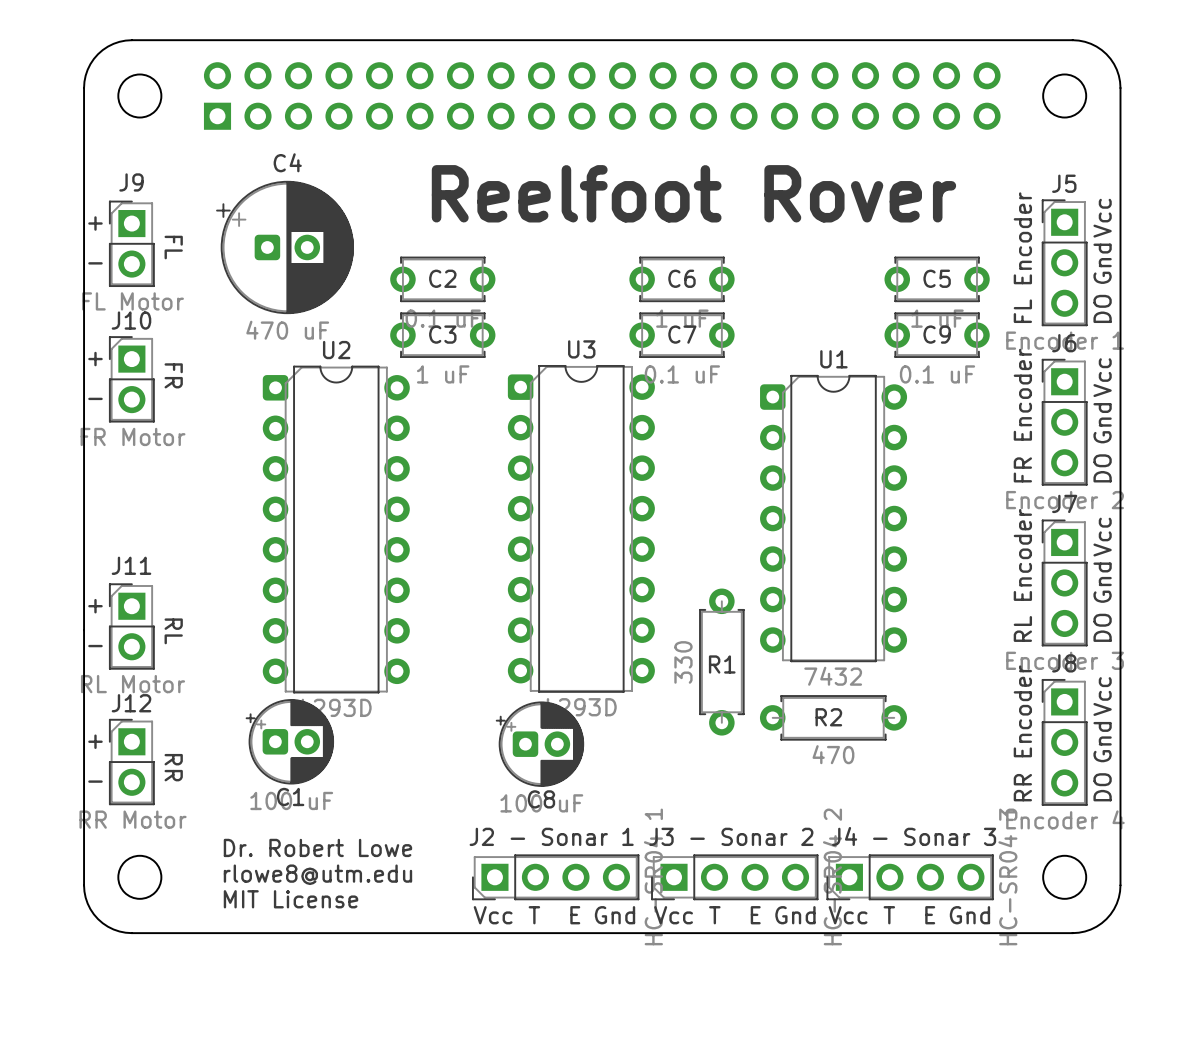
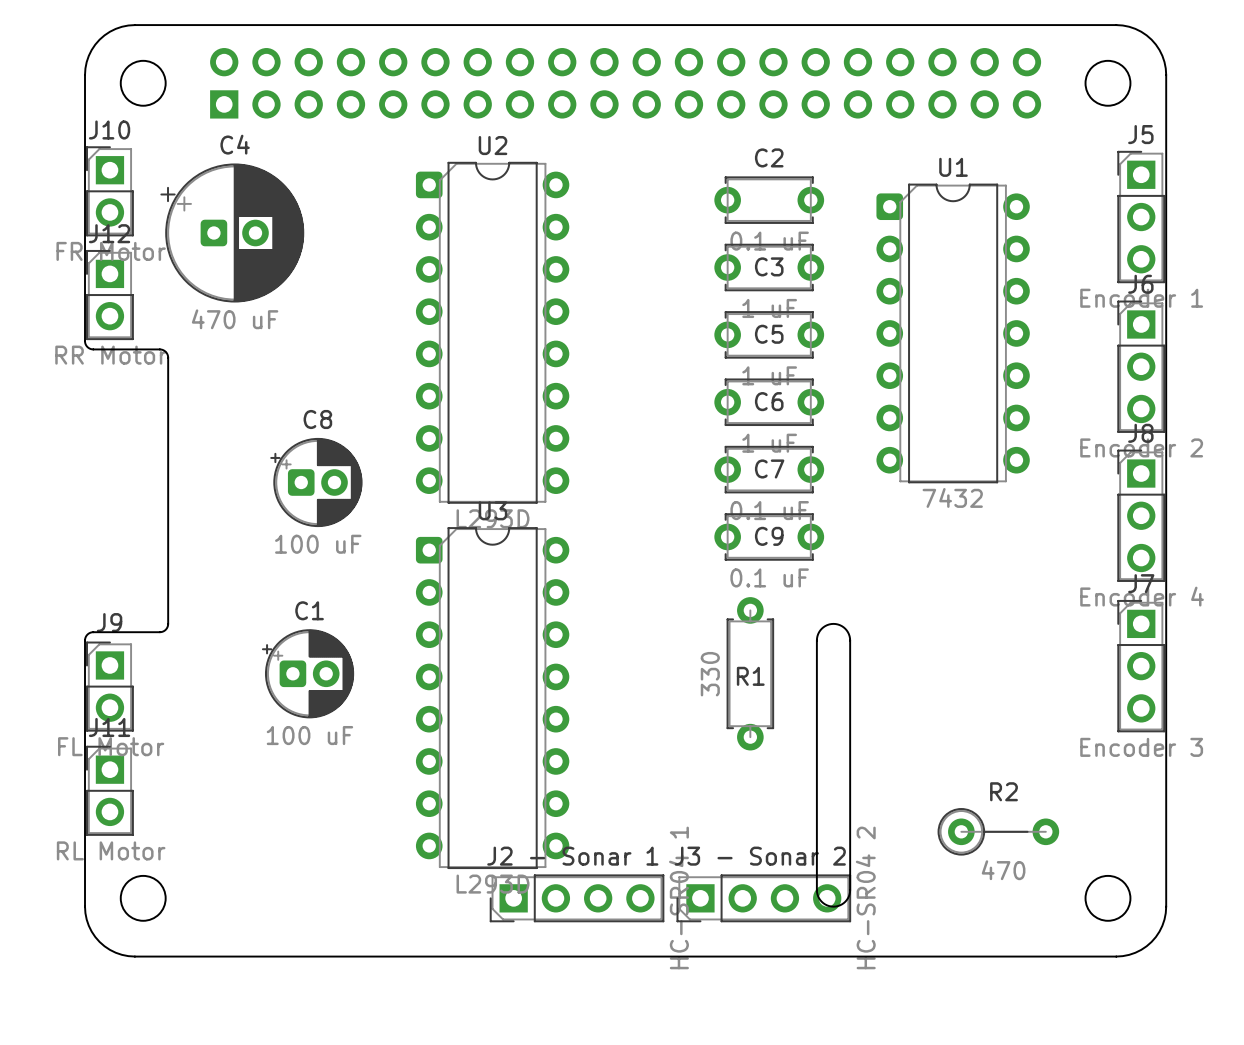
text: Reelfoot Rover (693, 193) -> none
text: Vcc (1102, 218) -> none
text: + (95, 223) -> none
J9 position: (131, 243) -> (109, 686)
text: FL (173, 247) -> none
C4 position: (285, 247) -> (232, 232)
text: FL Encoder (1022, 257) -> none
J5 position: (1064, 262) -> (1141, 217)
text: - (95, 263) -> none
text: Gnd (1102, 263) -> none
C2 name position: C2 (442, 278) -> C2 (769, 157)
C2 position: (442, 279) -> (769, 200)
C6 position: (681, 279) -> (769, 402)
C5 position: (937, 279) -> (769, 334)
text: DO (1102, 308) -> none
C3 position: (442, 335) -> (769, 267)
C7 position: (681, 335) -> (769, 469)
C9 position: (937, 335) -> (769, 536)
board edge: (84, 343) (84, 630) -> (85, 341) (86, 346) (92, 349) (162, 349) (166, 352) (168, 357) (167, 626) (160, 632) (92, 632) (87, 634) (85, 640)
text: + (95, 359) -> none
text: FR (173, 375) -> none
text: Vcc (1102, 377) -> none
J10 position: (131, 379) -> (109, 191)
text: - (95, 398) -> none
text: FR Encoder (1022, 415) -> none
J6 position: (1064, 422) -> (1141, 366)
text: Gnd (1102, 423) -> none
text: DO (1102, 468) -> none
U1 position: (833, 518) -> (953, 333)
U3 position: (581, 528) -> (492, 698)
U2 position: (336, 529) -> (492, 332)
text: Vcc (1102, 537) -> none
text: RL Encoder (1022, 575) -> none
J7 position: (1064, 582) -> (1141, 666)
text: Gnd (1102, 582) -> none
text: + (95, 606) -> none
J11 position: (131, 626) -> (109, 790)
text: DO (1102, 627) -> none
board edge: none -> (816, 640) (817, 892) (823, 903) (835, 906) (846, 900) (850, 890) (850, 638) (845, 628) (833, 623) (821, 628) (816, 640)
text: RL (173, 631) -> none
text: - (95, 646) -> none
R2 footprint: [759, 695, 907, 741] -> [937, 808, 1060, 856]
text: Vcc (1102, 696) -> none
R2 name position: R2 (828, 717) -> R2 (1004, 791)
text: RR Encoder (1022, 733) -> none
text: + (95, 741) -> none
C1 position: (289, 741) -> (308, 673)
J8 position: (1064, 742) -> (1141, 515)
text: Gnd (1102, 742) -> none
C8 position: (539, 744) -> (316, 482)
J12 position: (131, 762) -> (109, 295)
text: RR (173, 767) -> none
text: - (95, 781) -> none
text: DO (1102, 787) -> none
C1 name position: C1 (290, 796) -> C1 (309, 610)
C8 name position: C8 (541, 799) -> C8 (317, 419)
text: Dr. Robert Lowe (317, 847) -> none
text: rlowe8@utm.edu (317, 874) -> none
J4 - Sonar 3: HC-SR04 3 (910, 877) -> none
text: MIT License (291, 899) -> none
text: Vcc (493, 915) -> none
text: T (534, 915) -> none
text: E (575, 915) -> none
text: Gnd (615, 915) -> none
text: Vcc (673, 915) -> none
text: T (714, 915) -> none
text: E (755, 915) -> none
text: Gnd (795, 915) -> none
text: Vcc (848, 915) -> none
text: T (889, 915) -> none
text: E (930, 915) -> none
text: Gnd (969, 915) -> none

